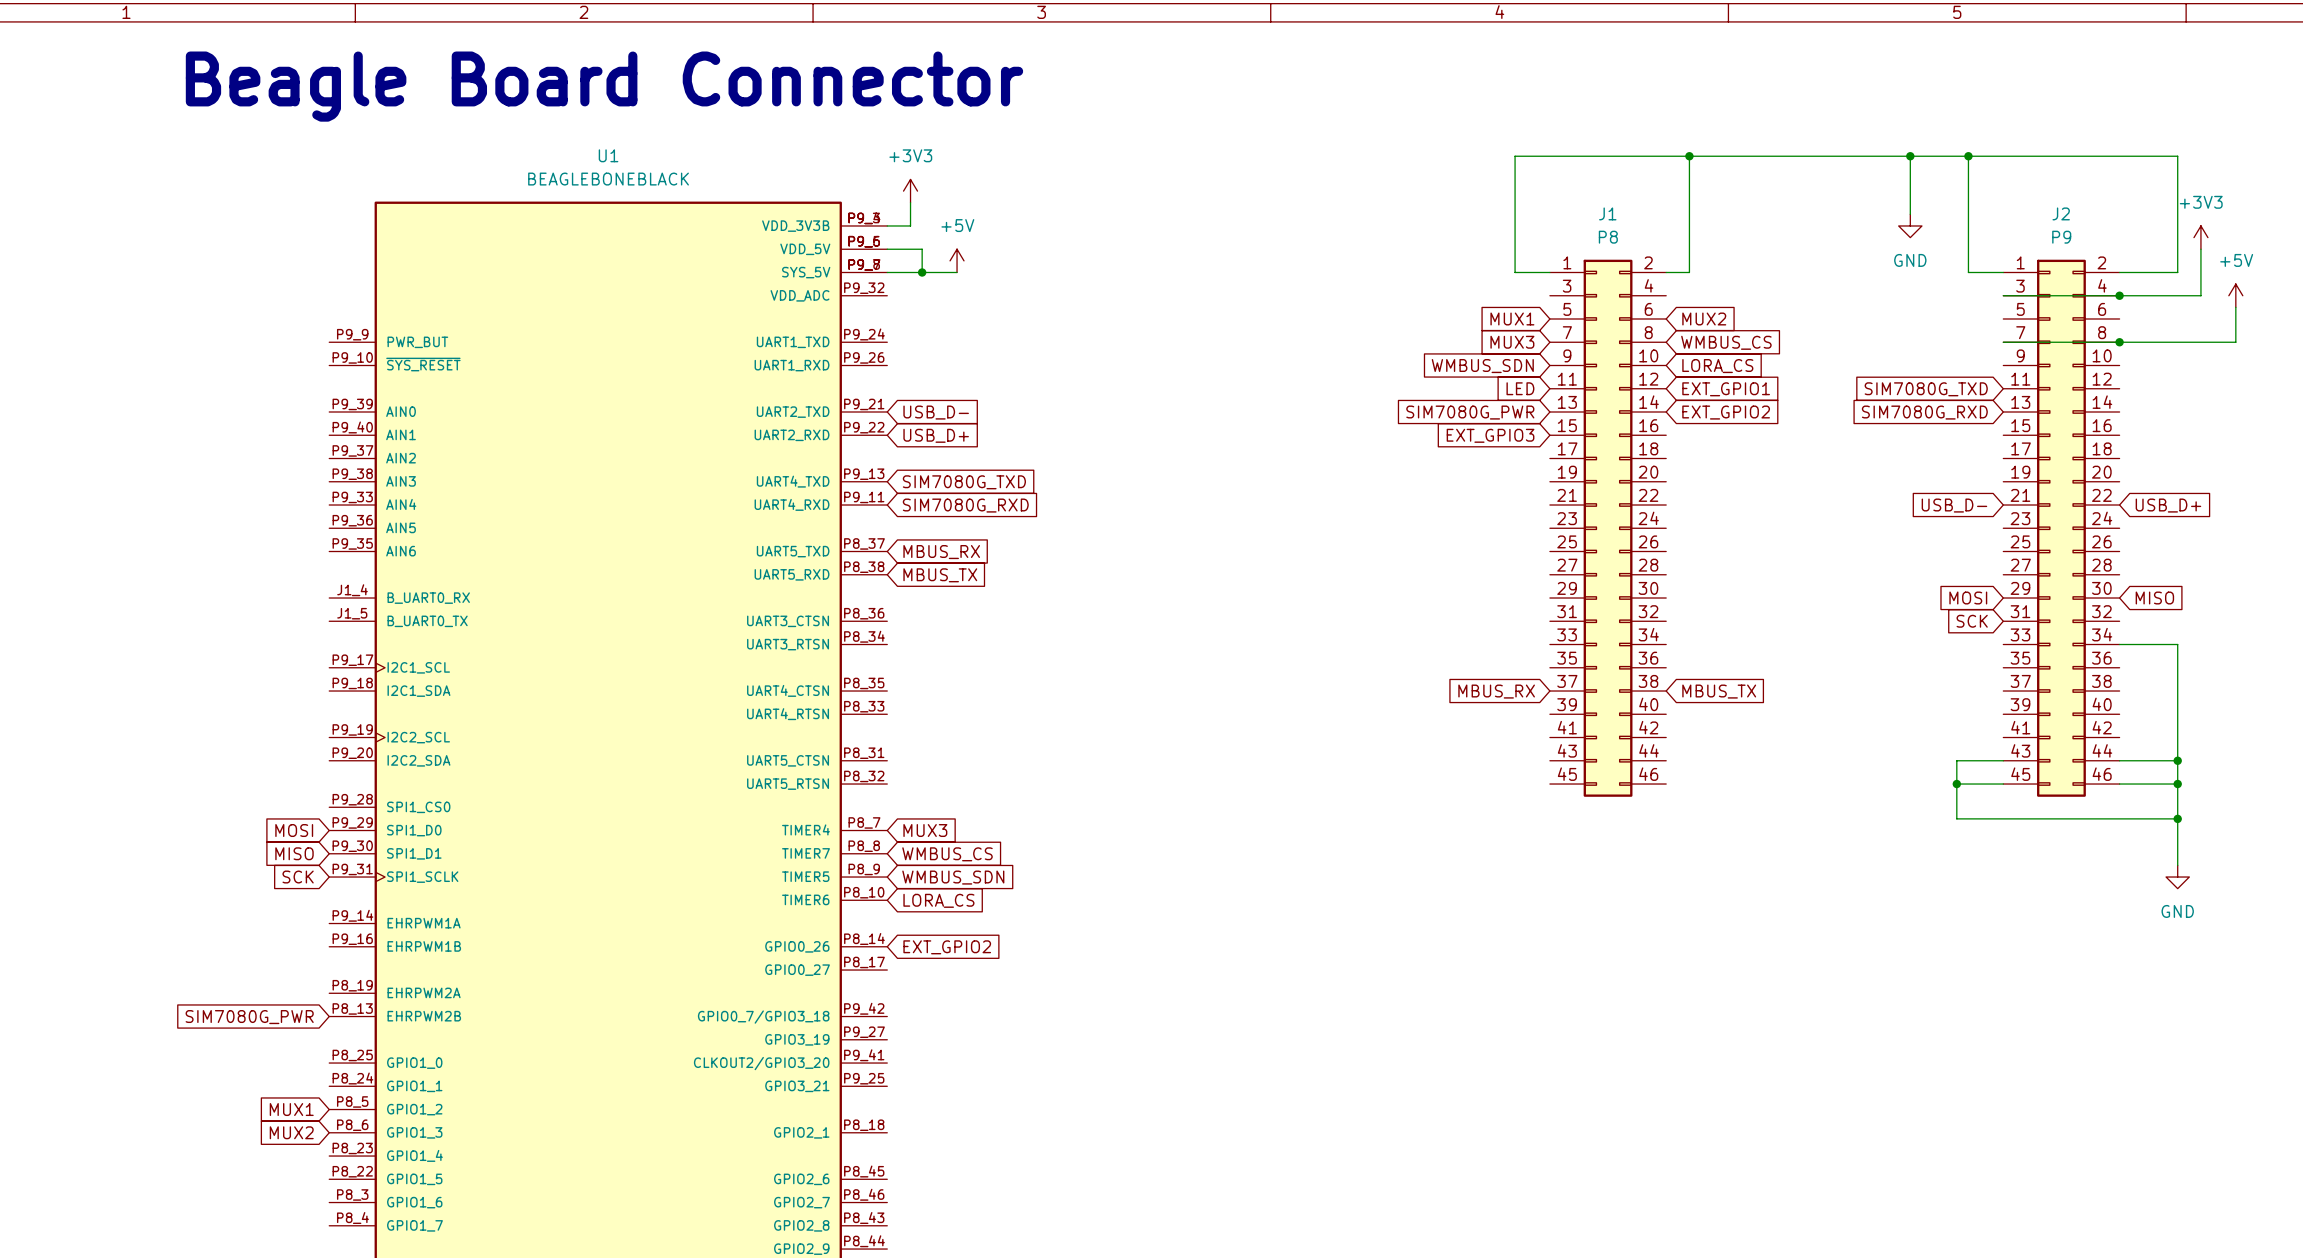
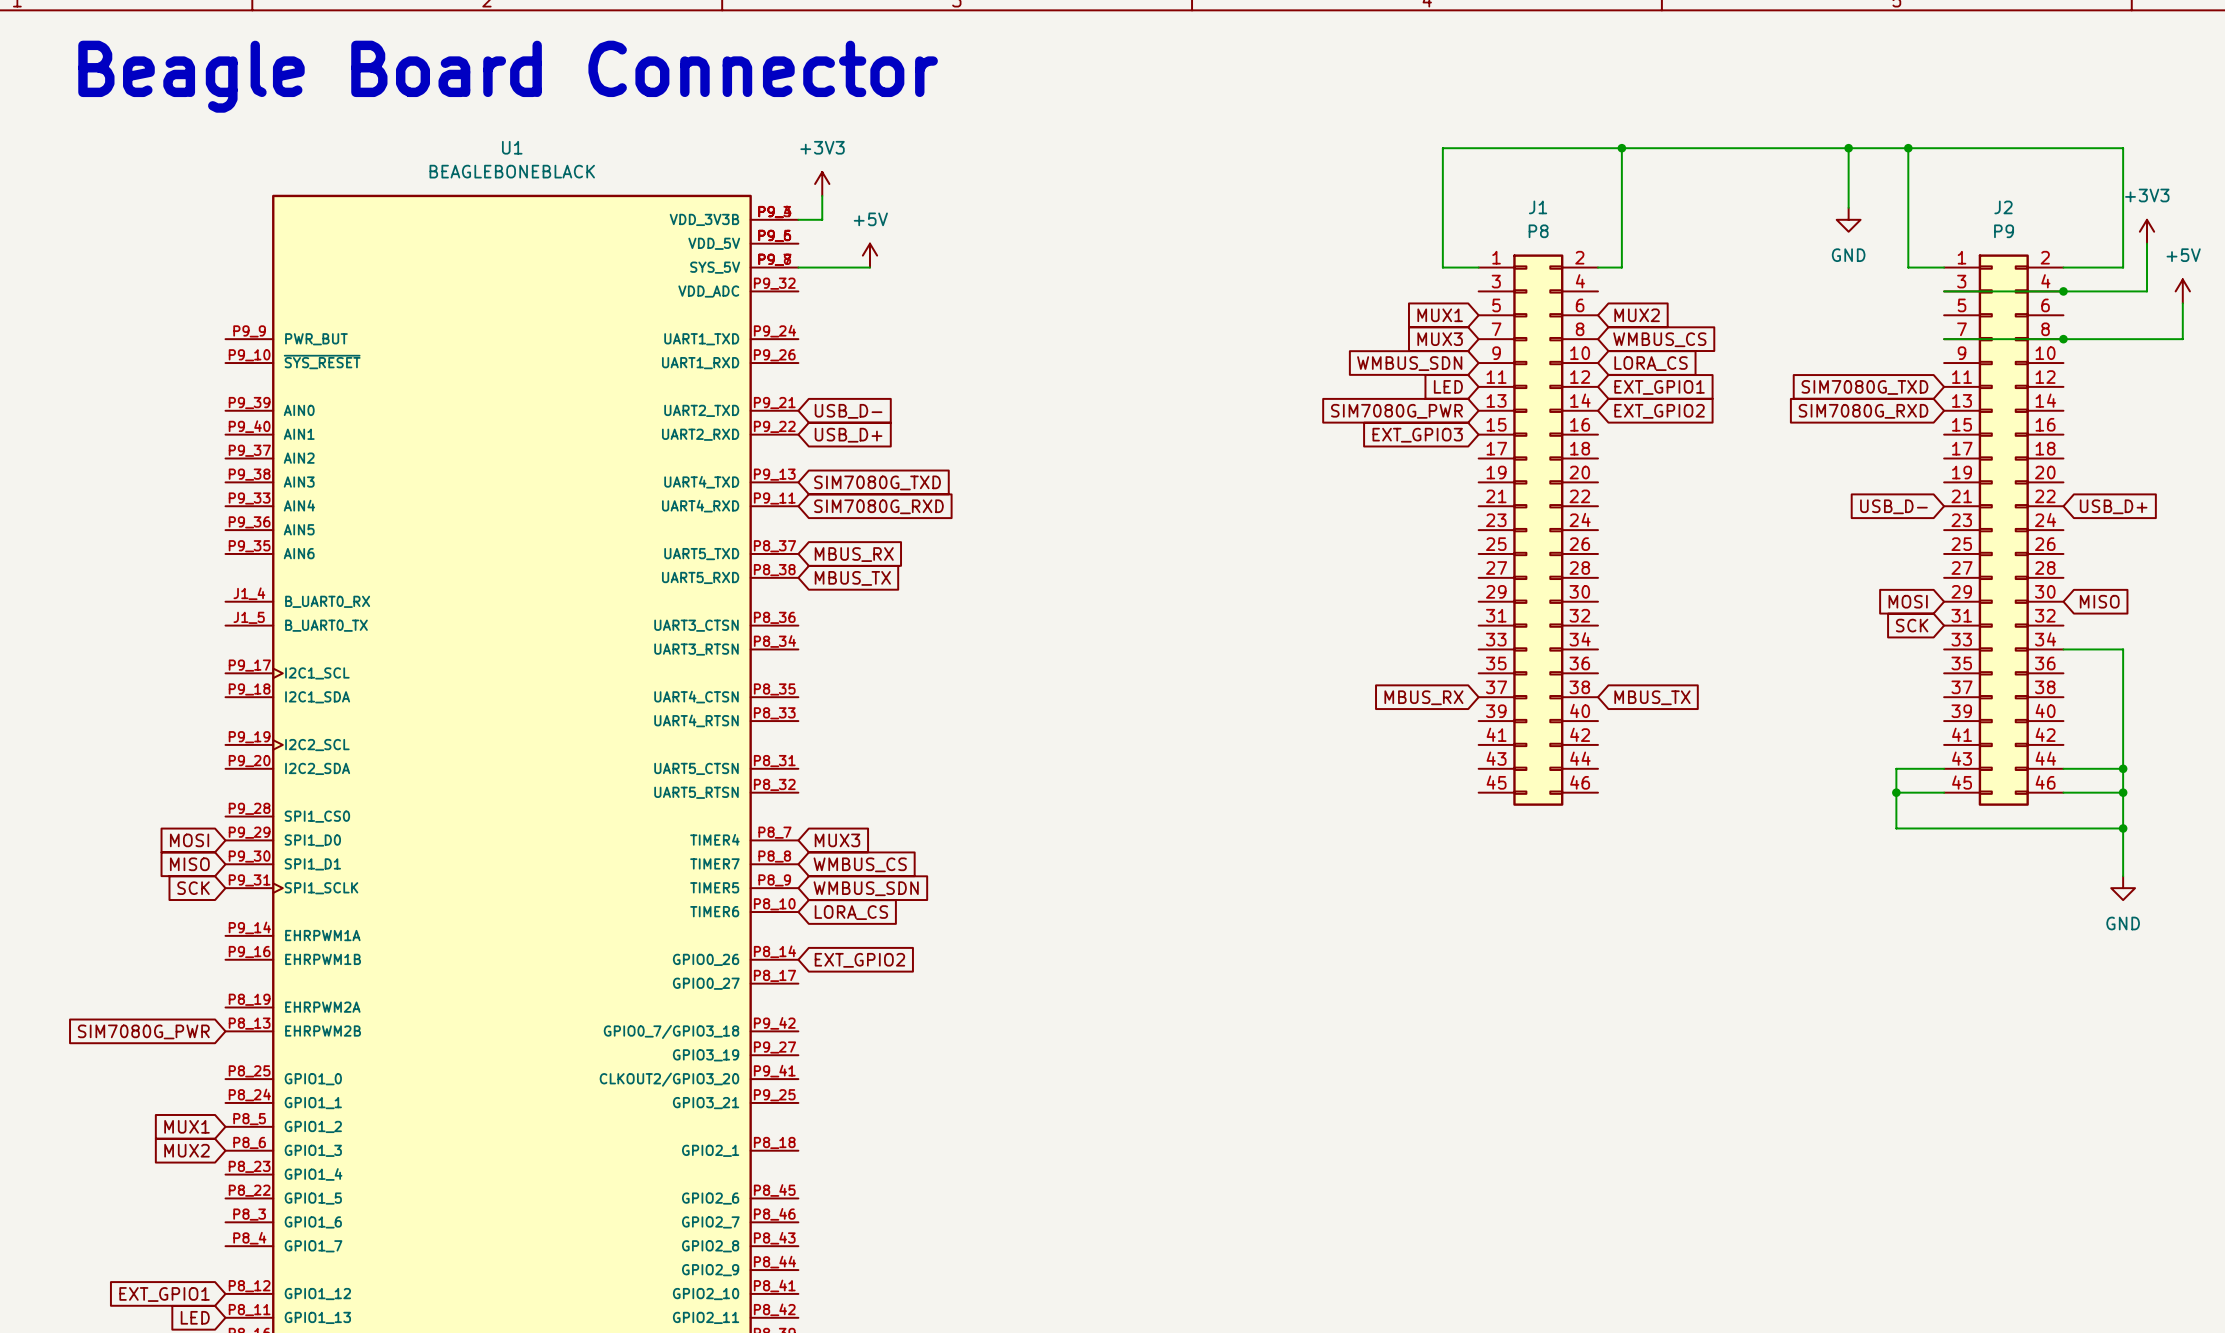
wire: (887, 249) (922, 249) (922, 272) -> none
junction: (922, 272) -> none

